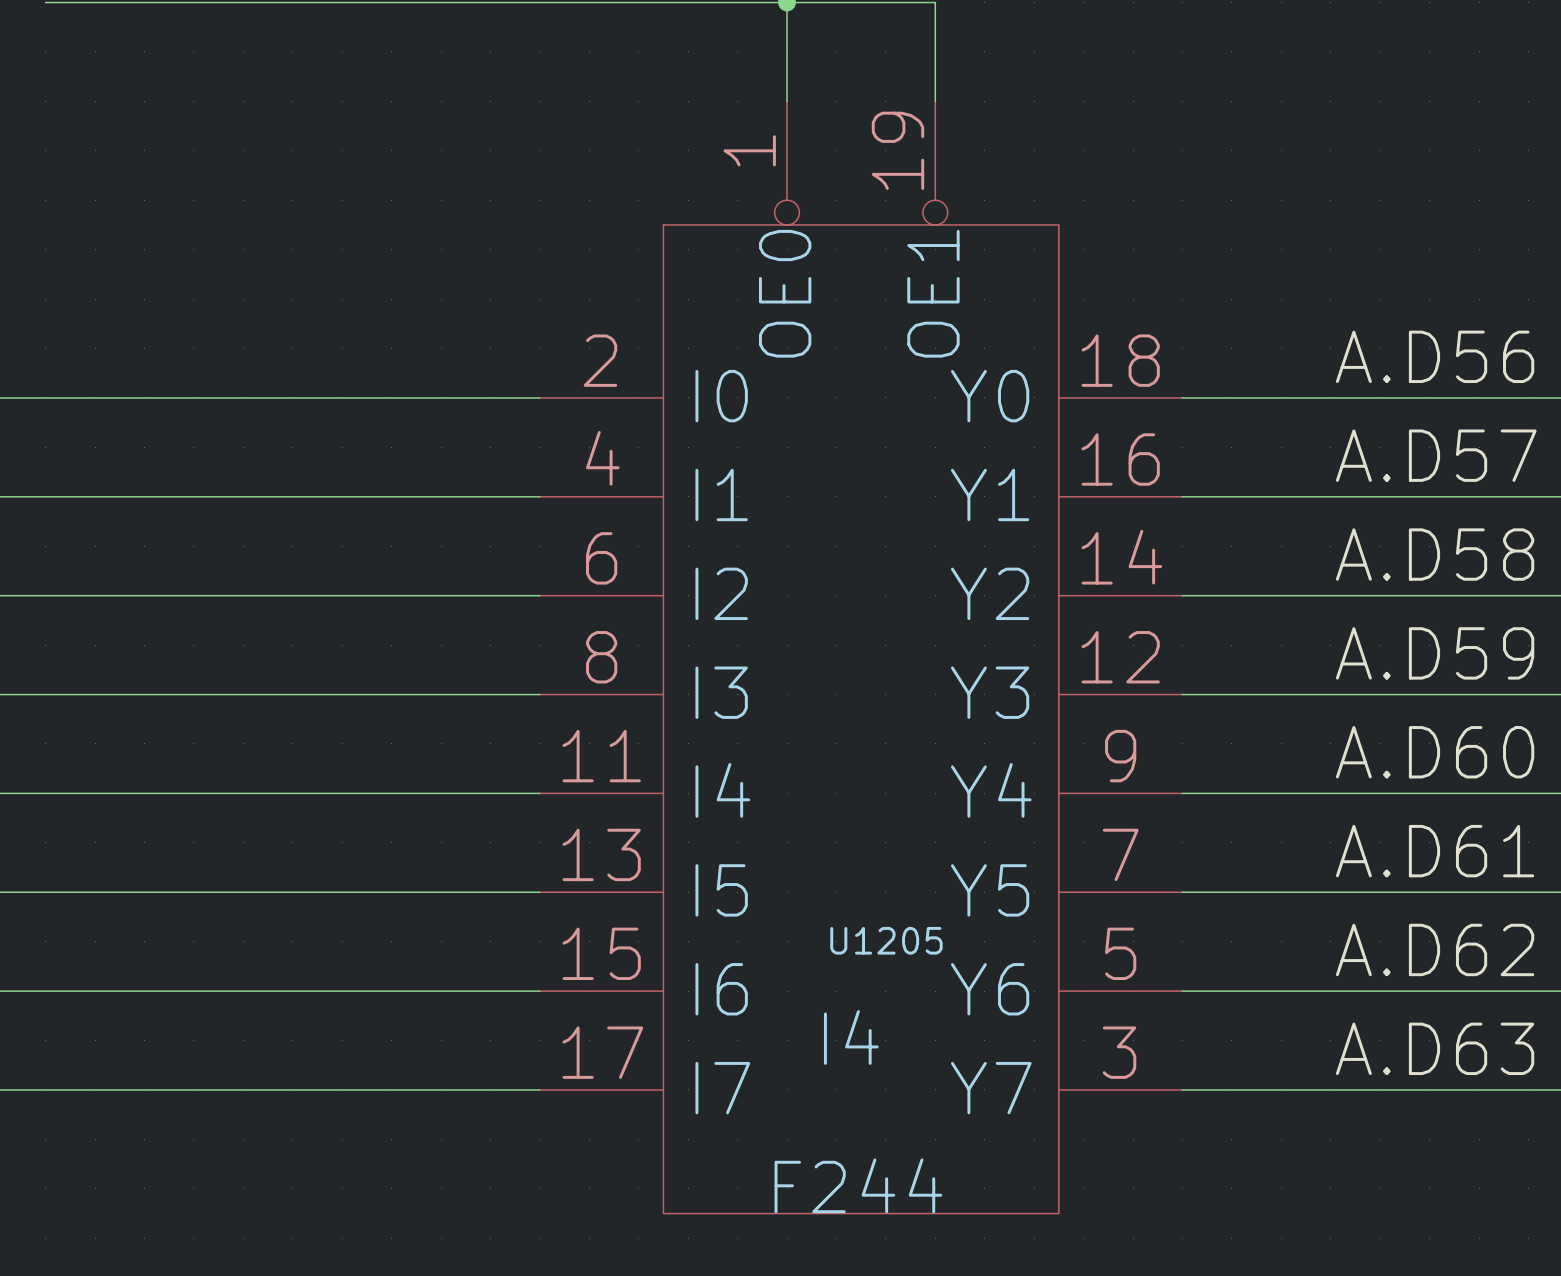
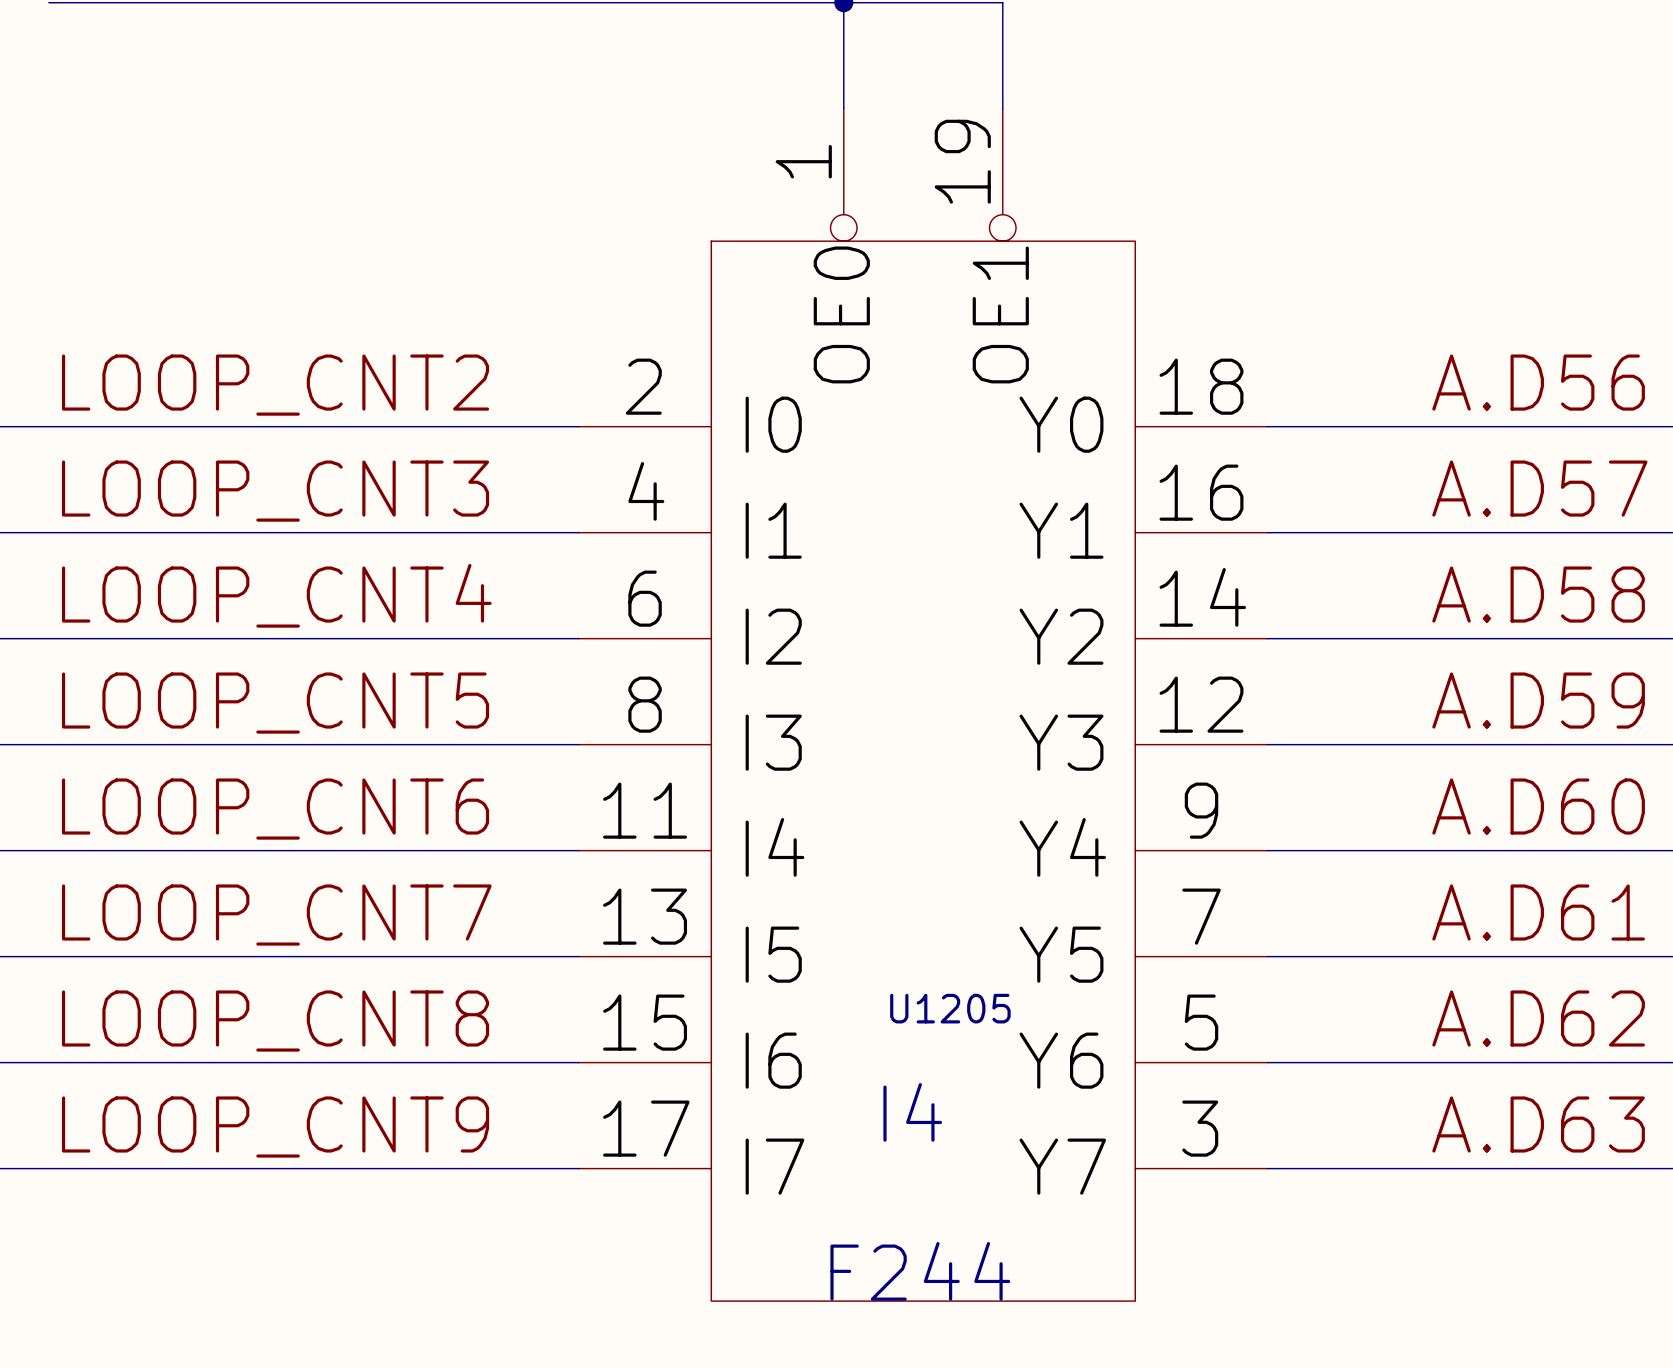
label: none -> LOOP_CNT2 (275, 385)
label: none -> LOOP_CNT3 (275, 491)
label: none -> LOOP_CNT4 (276, 595)
label: none -> LOOP_CNT5 (275, 703)
label: none -> LOOP_CNT6 (275, 809)
label: none -> LOOP_CNT7 (276, 915)
label: none -> LOOP_CNT8 (275, 1021)
label: none -> LOOP_CNT9 (275, 1127)

